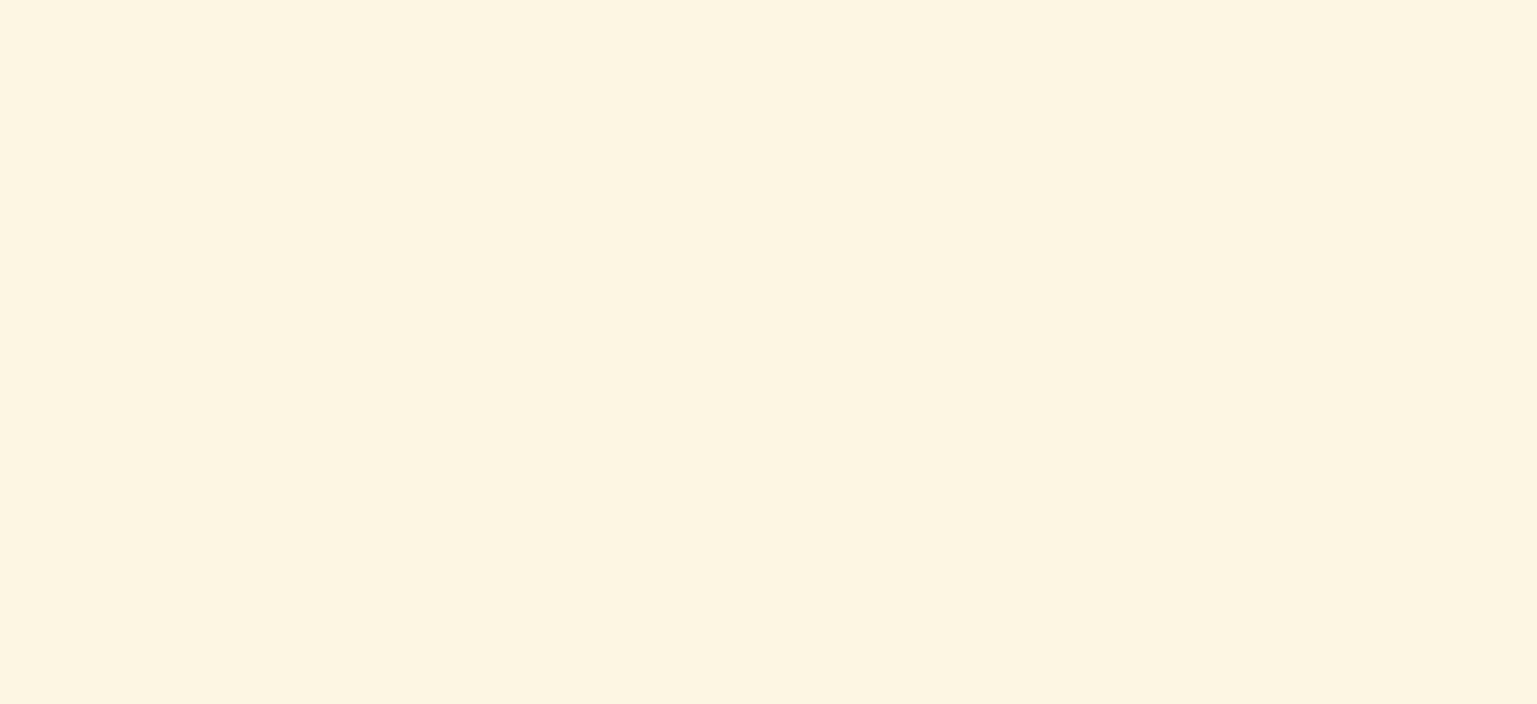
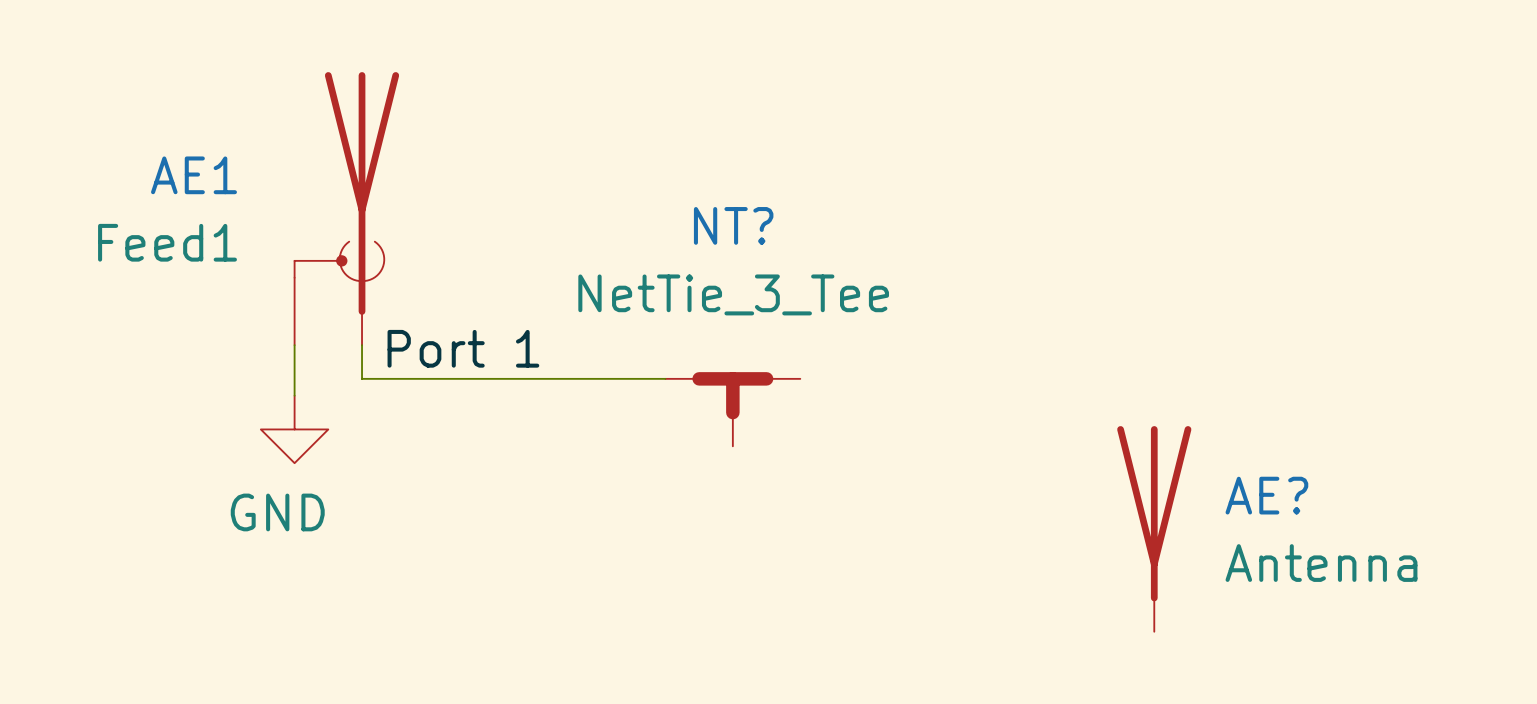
AE1: none -> Feed1 (346, 208)
wire: none -> (294, 345) (294, 395)
wire: none -> (362, 345) (362, 378) (665, 378)
label: none -> Port 1 (463, 348)
NT?: none -> NetTie_3_Tee (732, 410)
power symbol: none -> GND (294, 429)
AE?: none -> Antenna (1154, 528)

